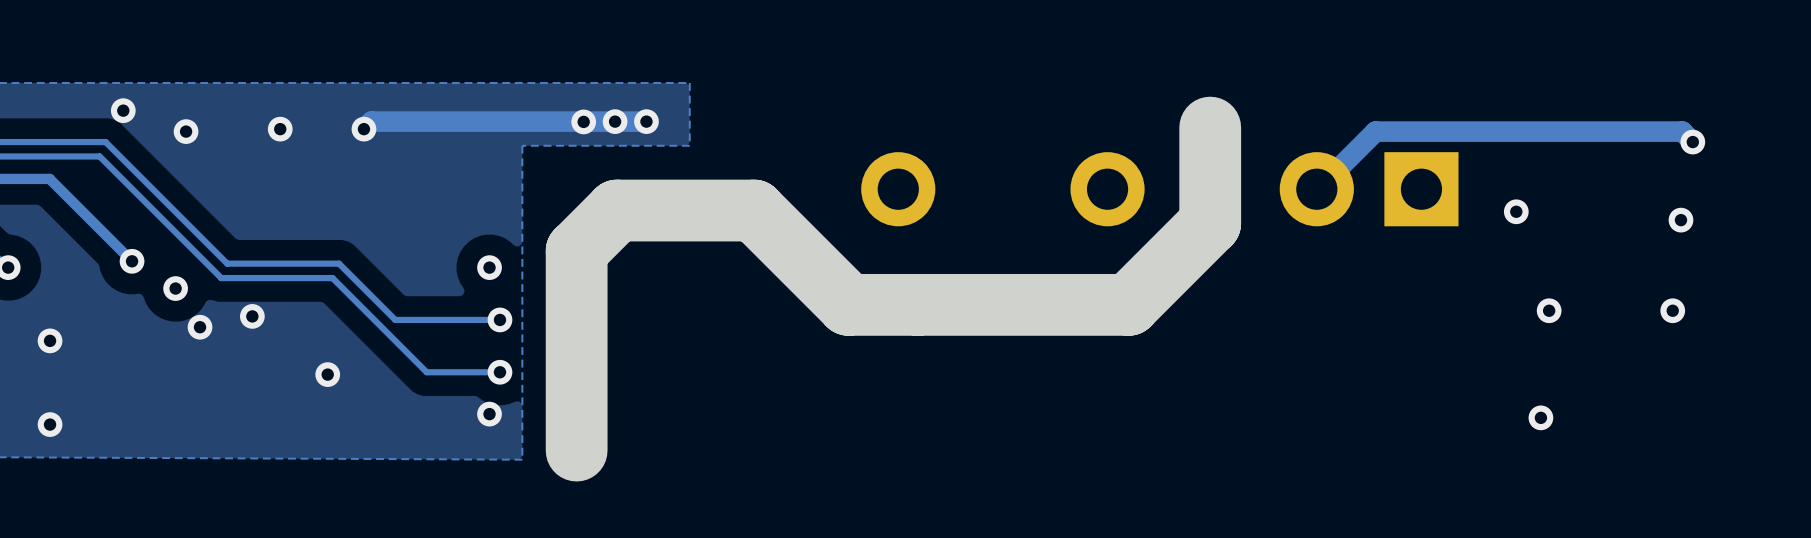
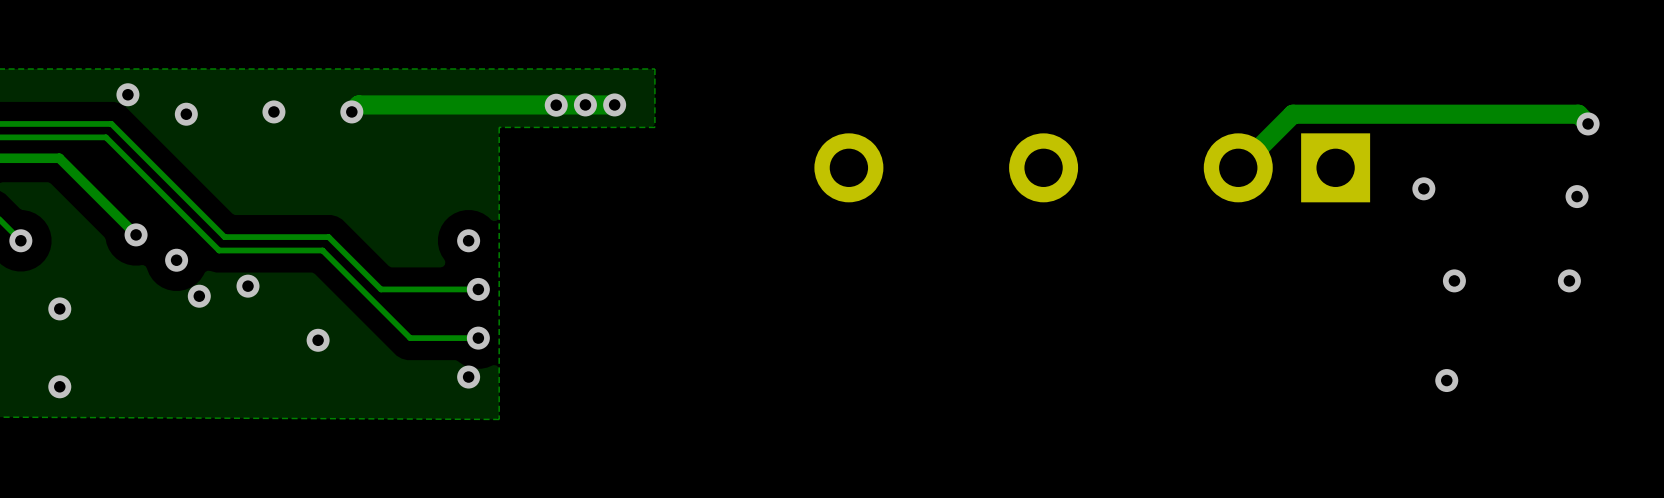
board edge: (1210, 127) (1210, 223) (1128, 304) (848, 304) (754, 210) (617, 210) (576, 250) (576, 450) -> none

